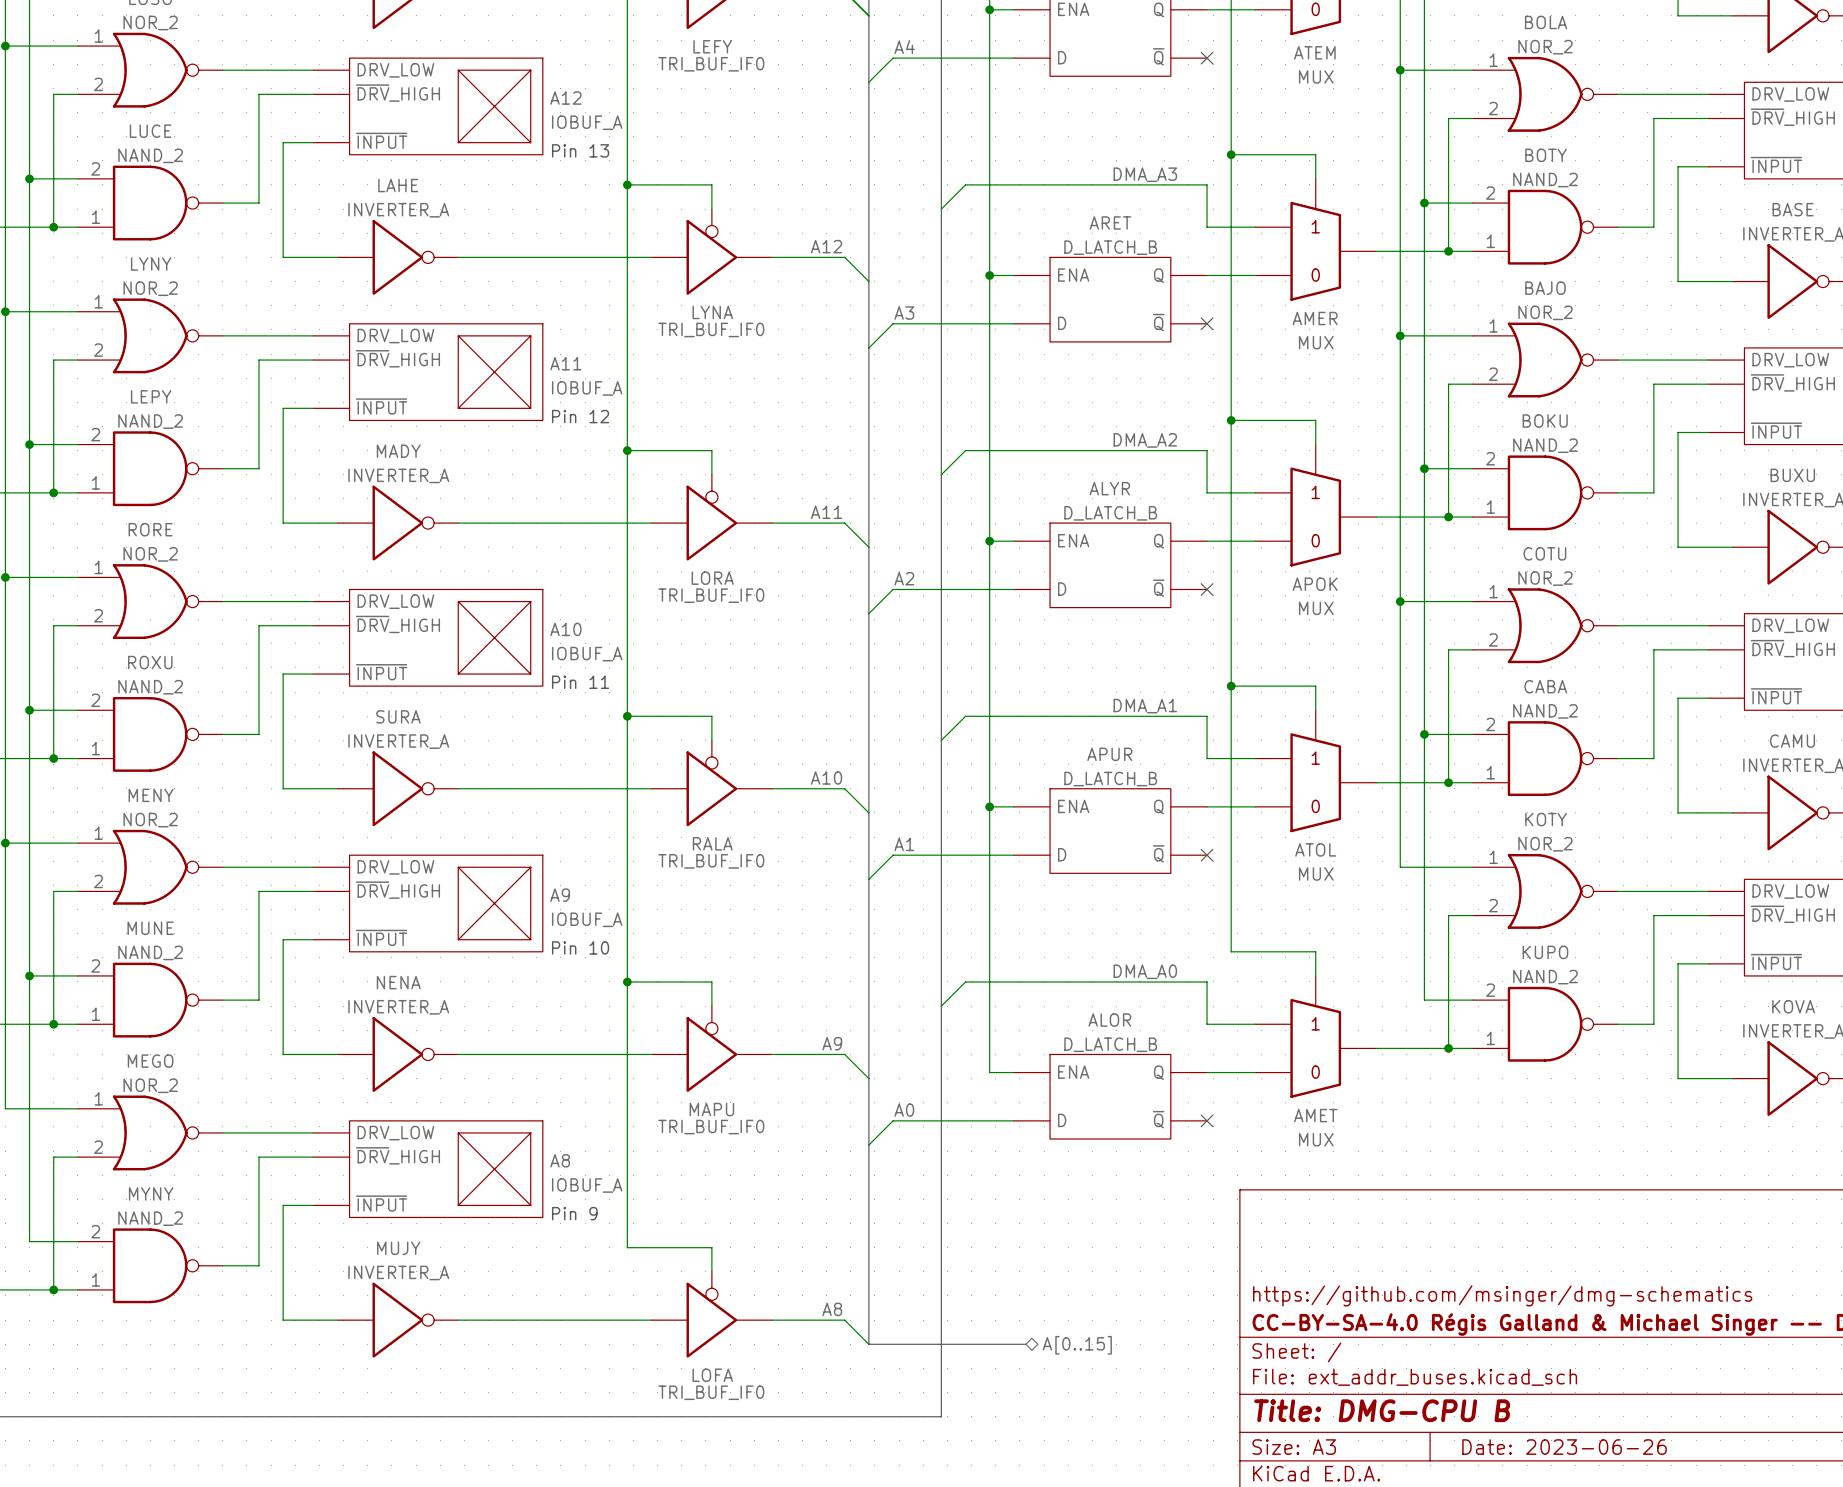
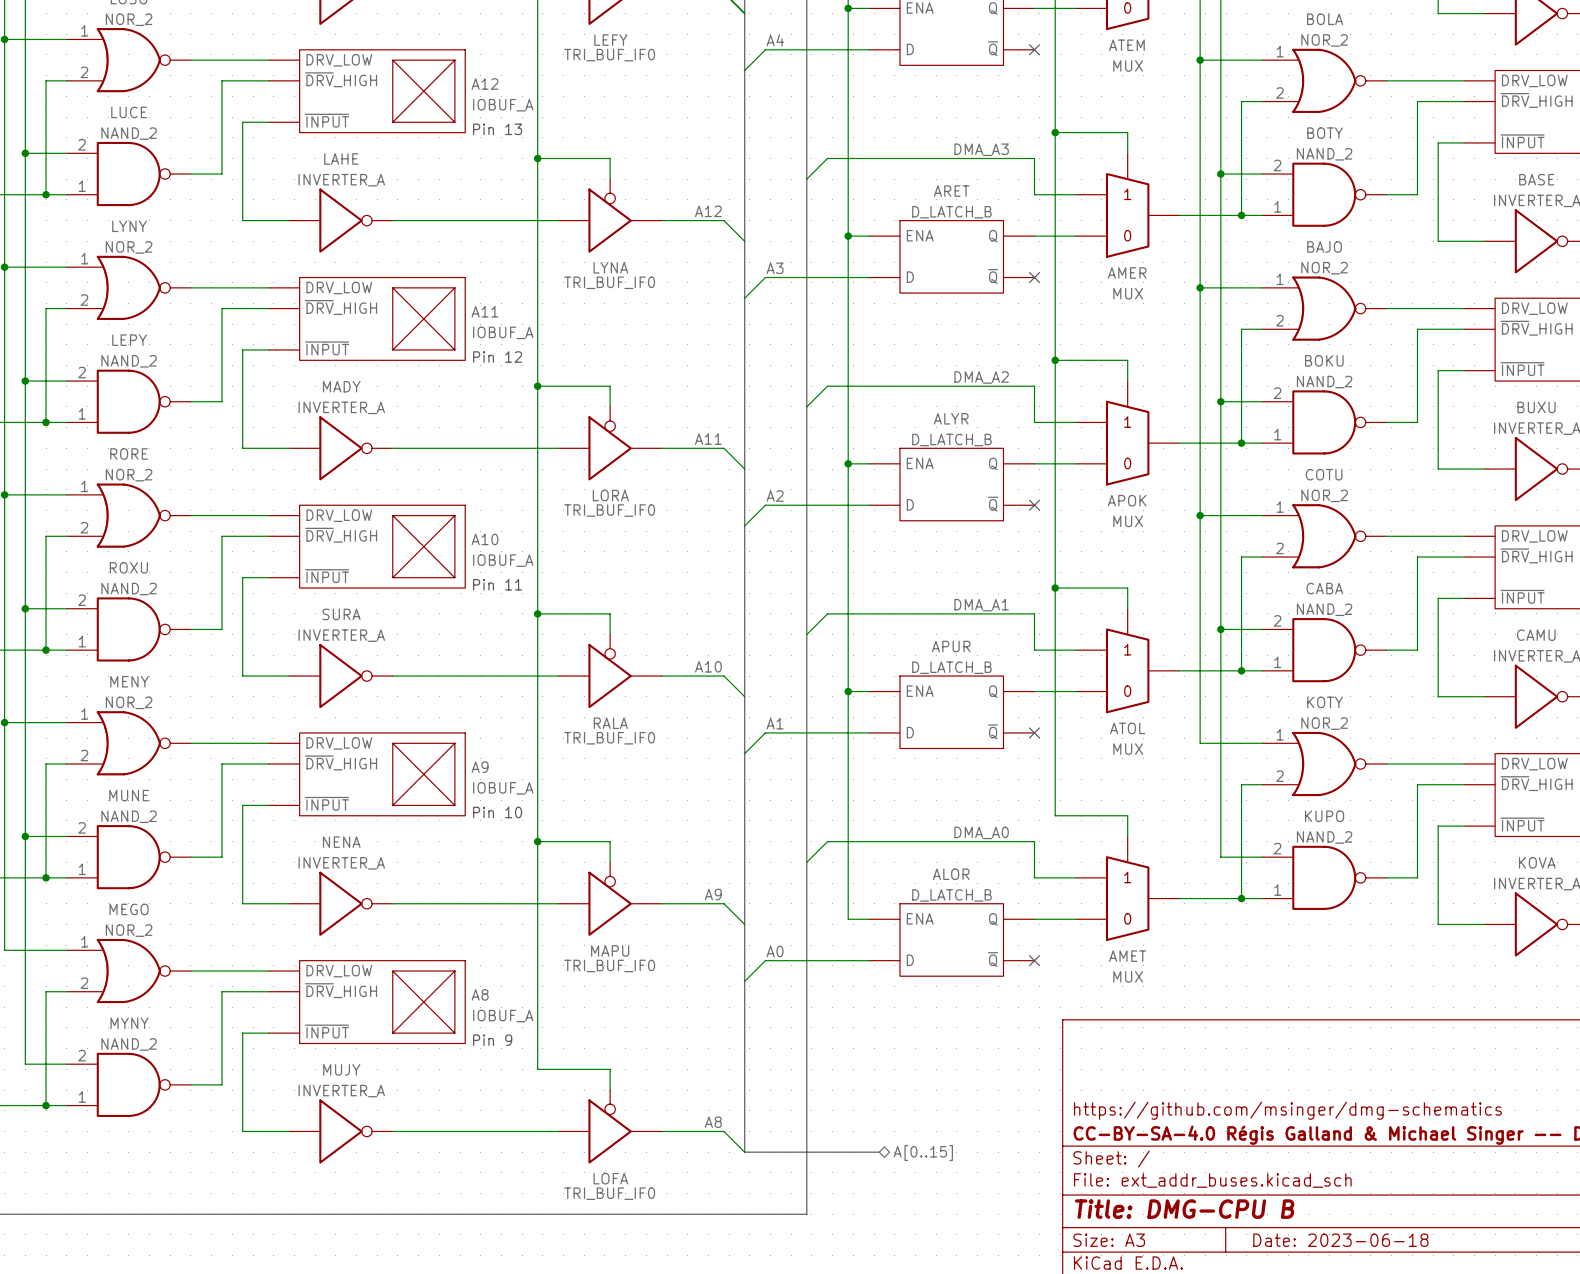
title block: Date: 2023-06-26 (1564, 1447) -> Date: 2023-06-18 (1340, 1240)

